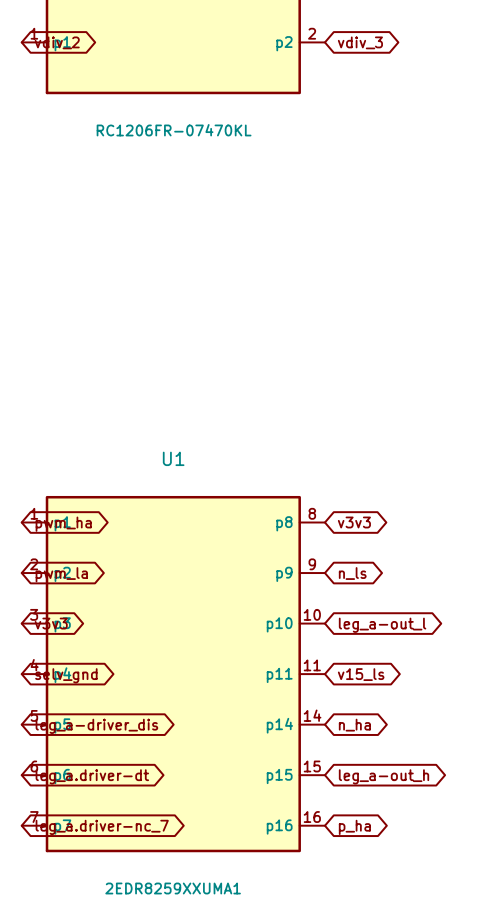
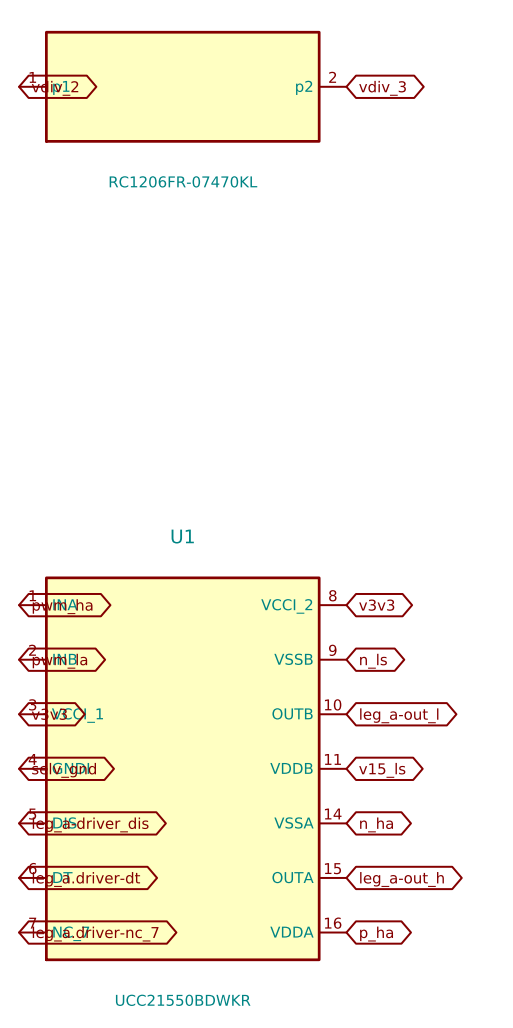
U1 symbol: [21, 495, 325, 853] -> [19, 576, 347, 962]
U1 value: 2EDR8259XXUMA1 (173, 888) -> UCC21550BDWKR (183, 1000)

